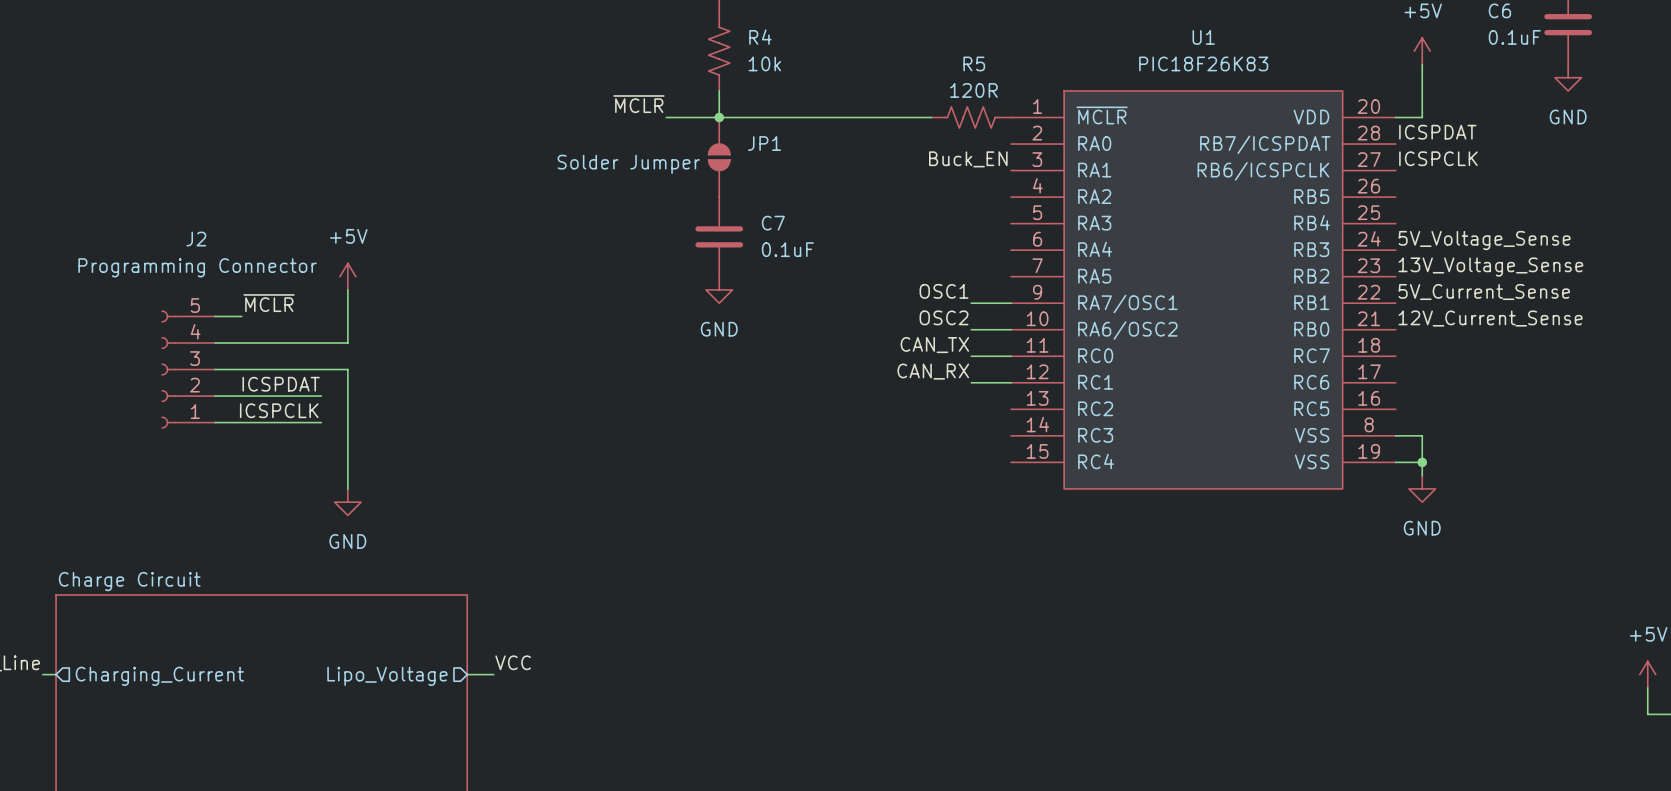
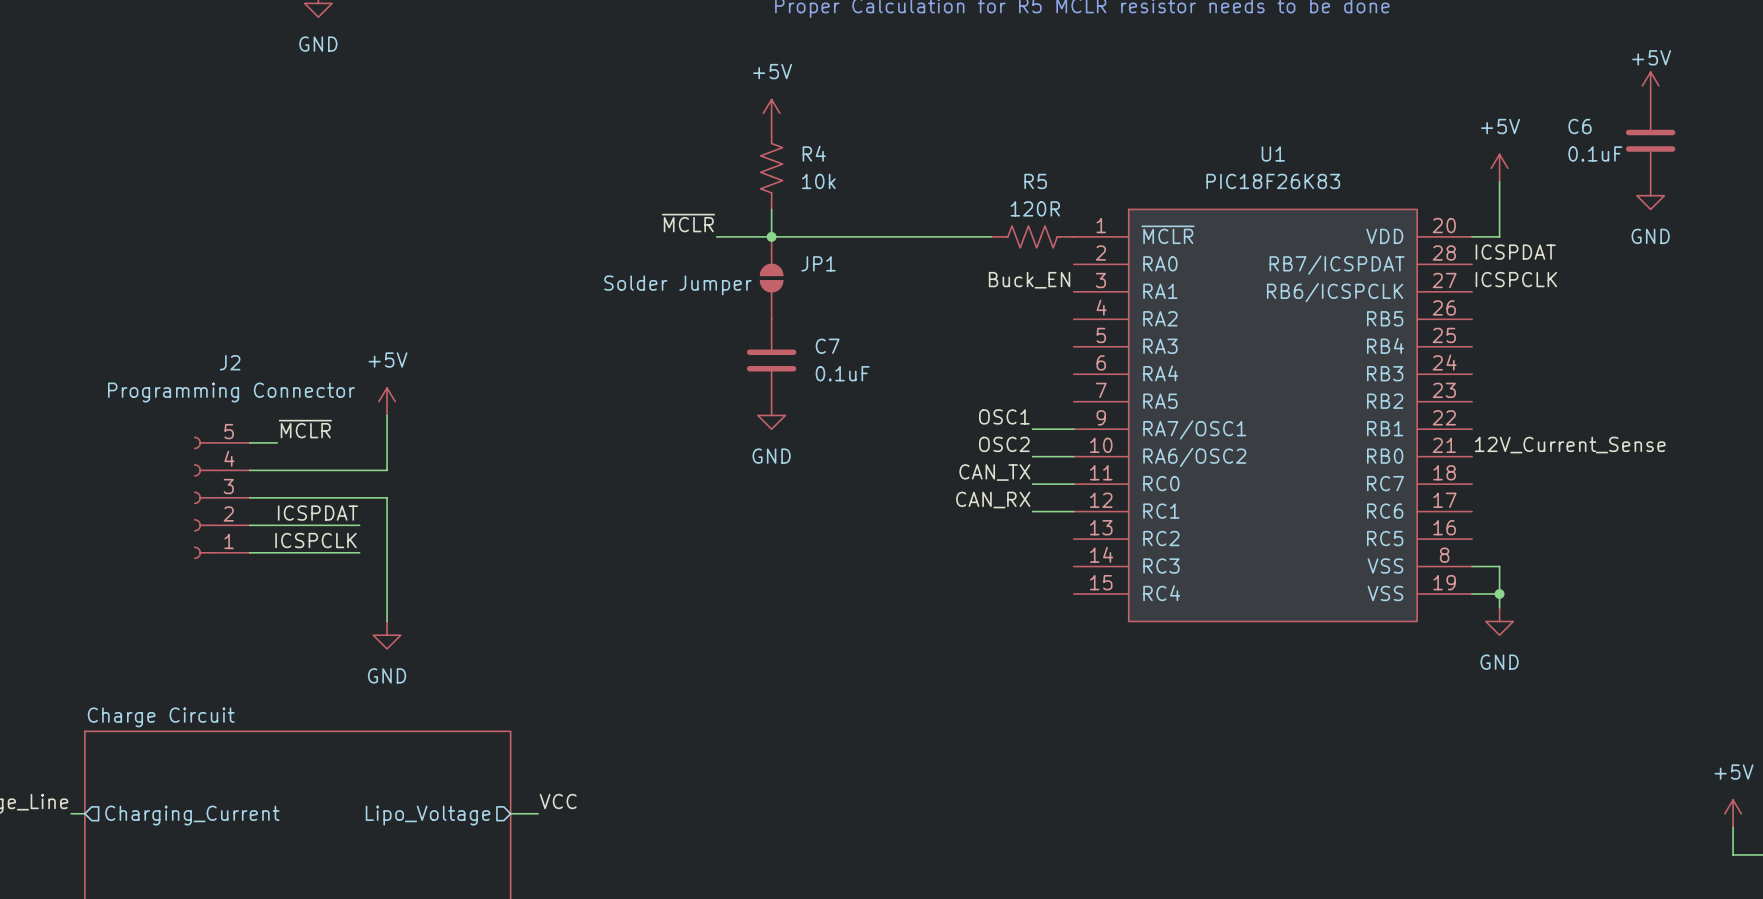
label: 5V_Voltage_Sense (1484, 240) -> none
label: 13V_Voltage_Sense (1490, 267) -> none
label: 5V_Current_Sense (1484, 292) -> none

